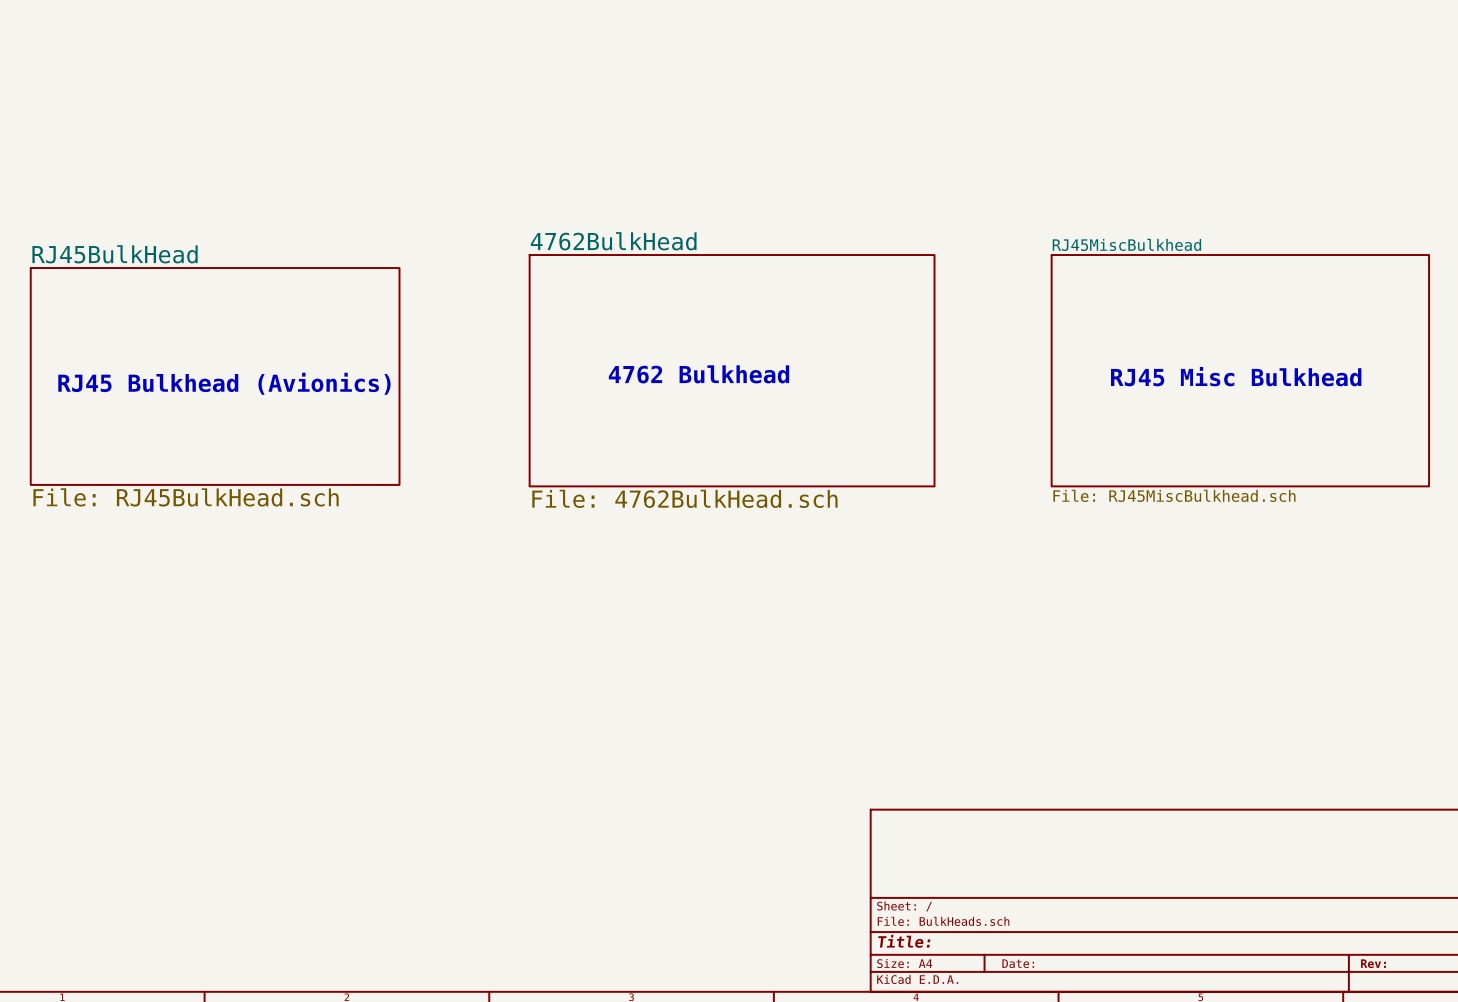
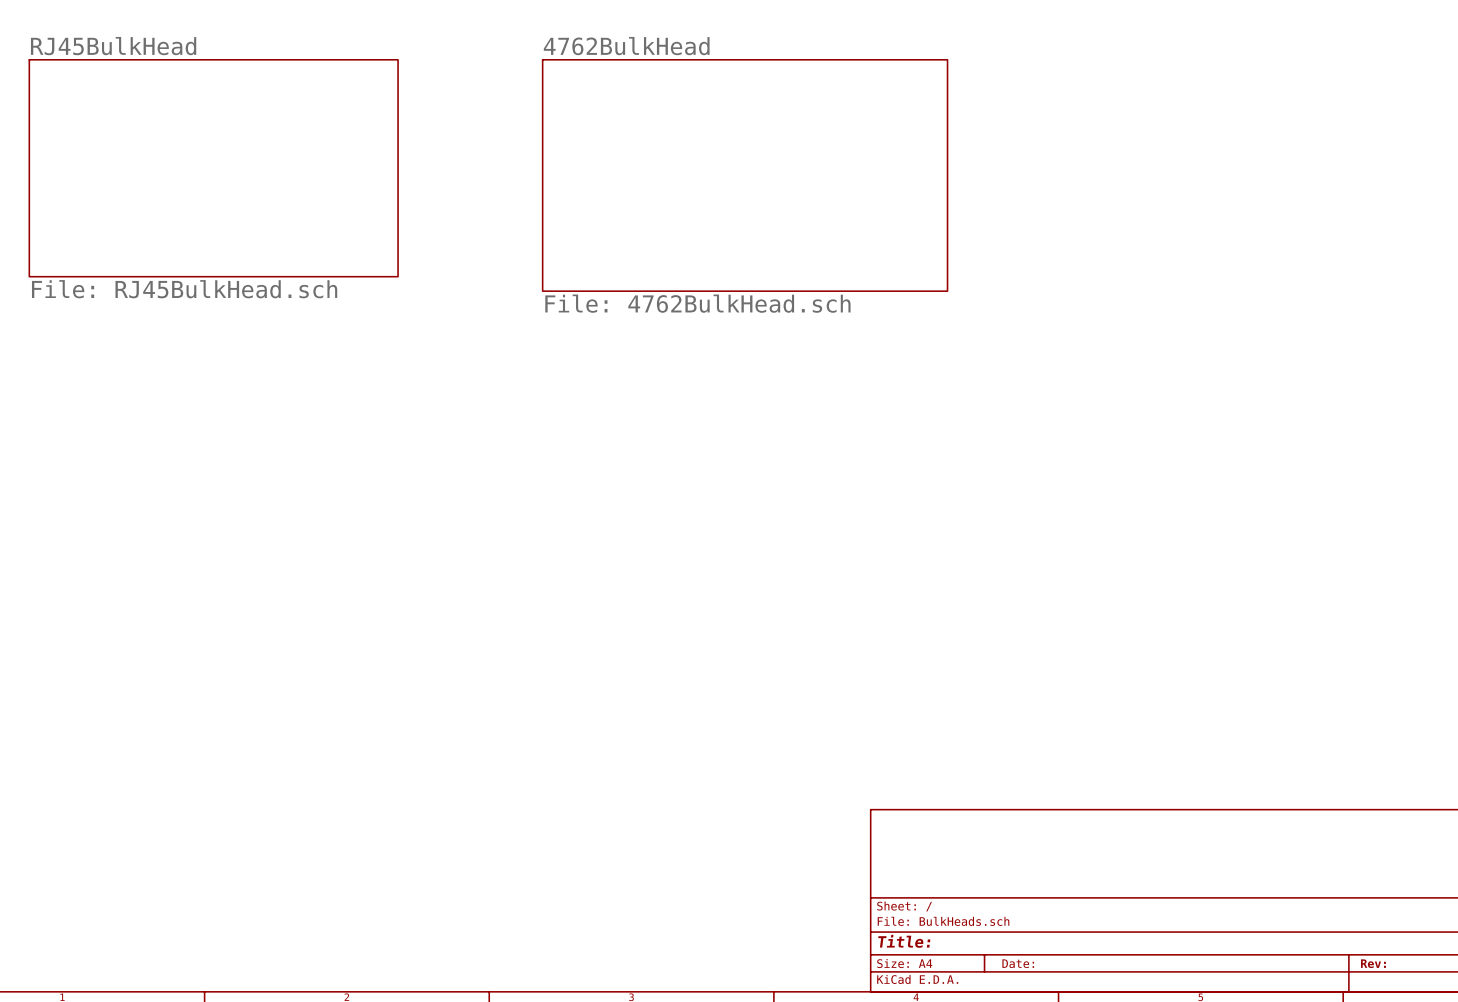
sheet 4762BulkHead position: (732, 370) -> (745, 175)
sheet RJ45MiscBulkhead: File: RJ45MiscBulkhead.sch (1240, 370) -> none
text: 4762 Bulkhead (699, 374) -> none
sheet RJ45BulkHead position: (215, 376) -> (213, 168)
text: RJ45 Misc Bulkhead (1236, 376) -> none
text: RJ45 Bulkhead (Avionics) (224, 383) -> none

